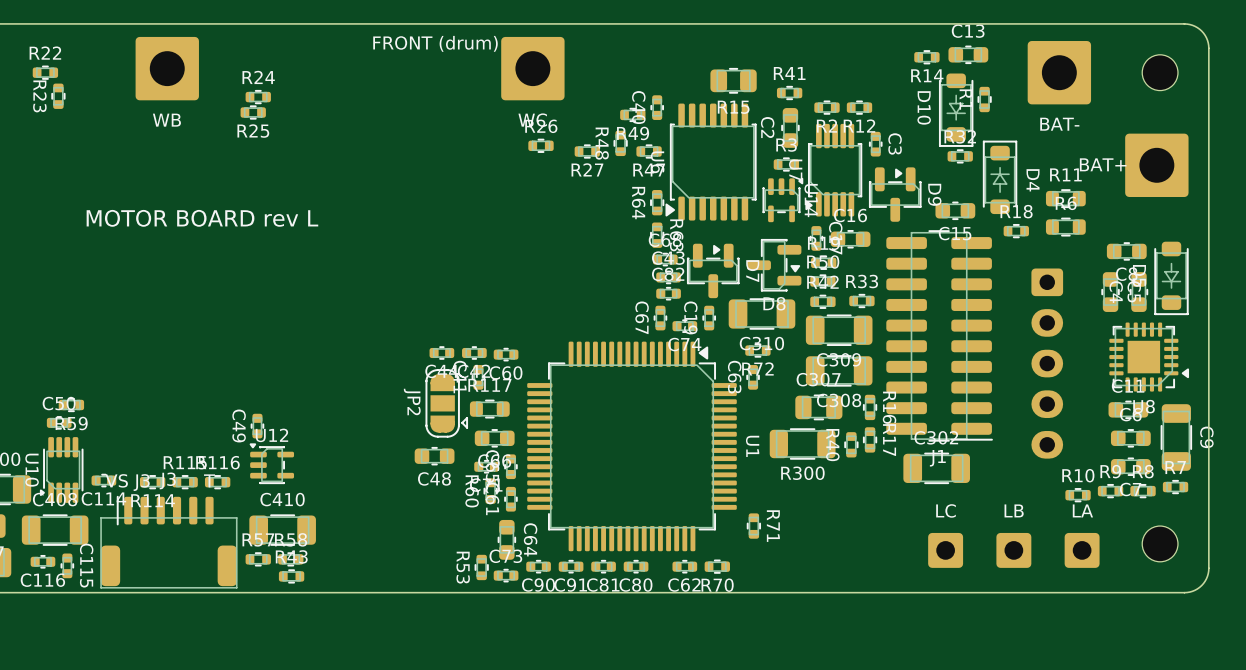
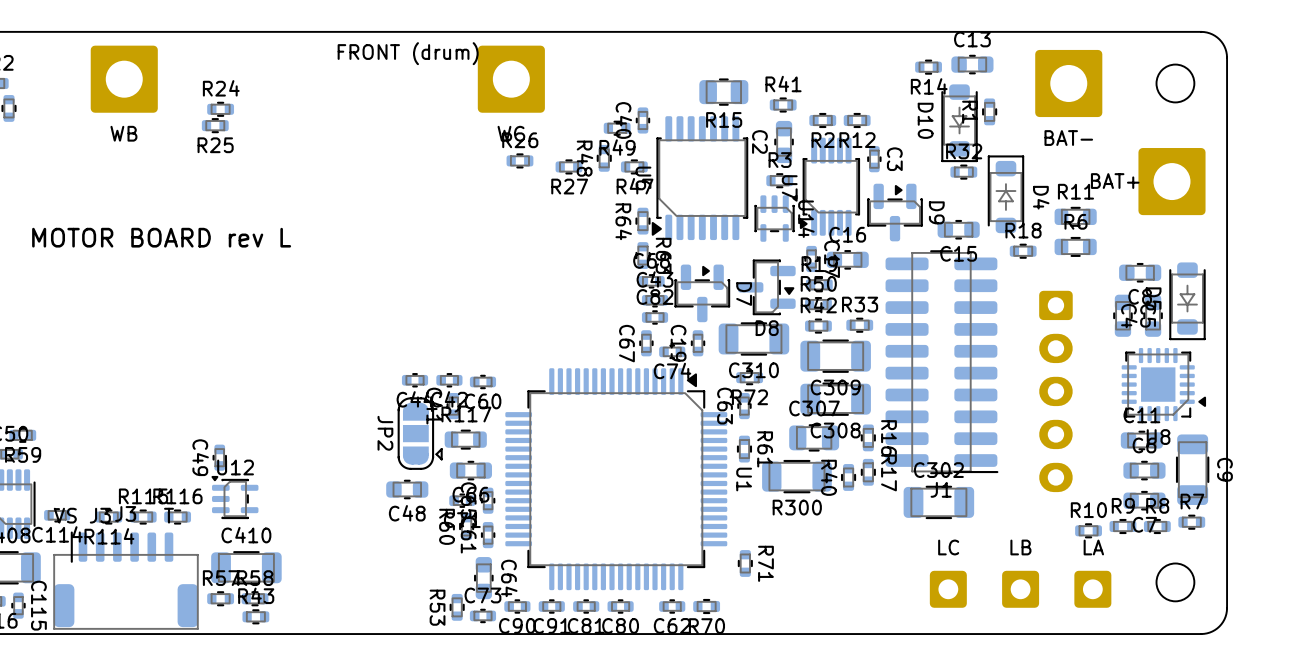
R61: none -> (744, 449)

